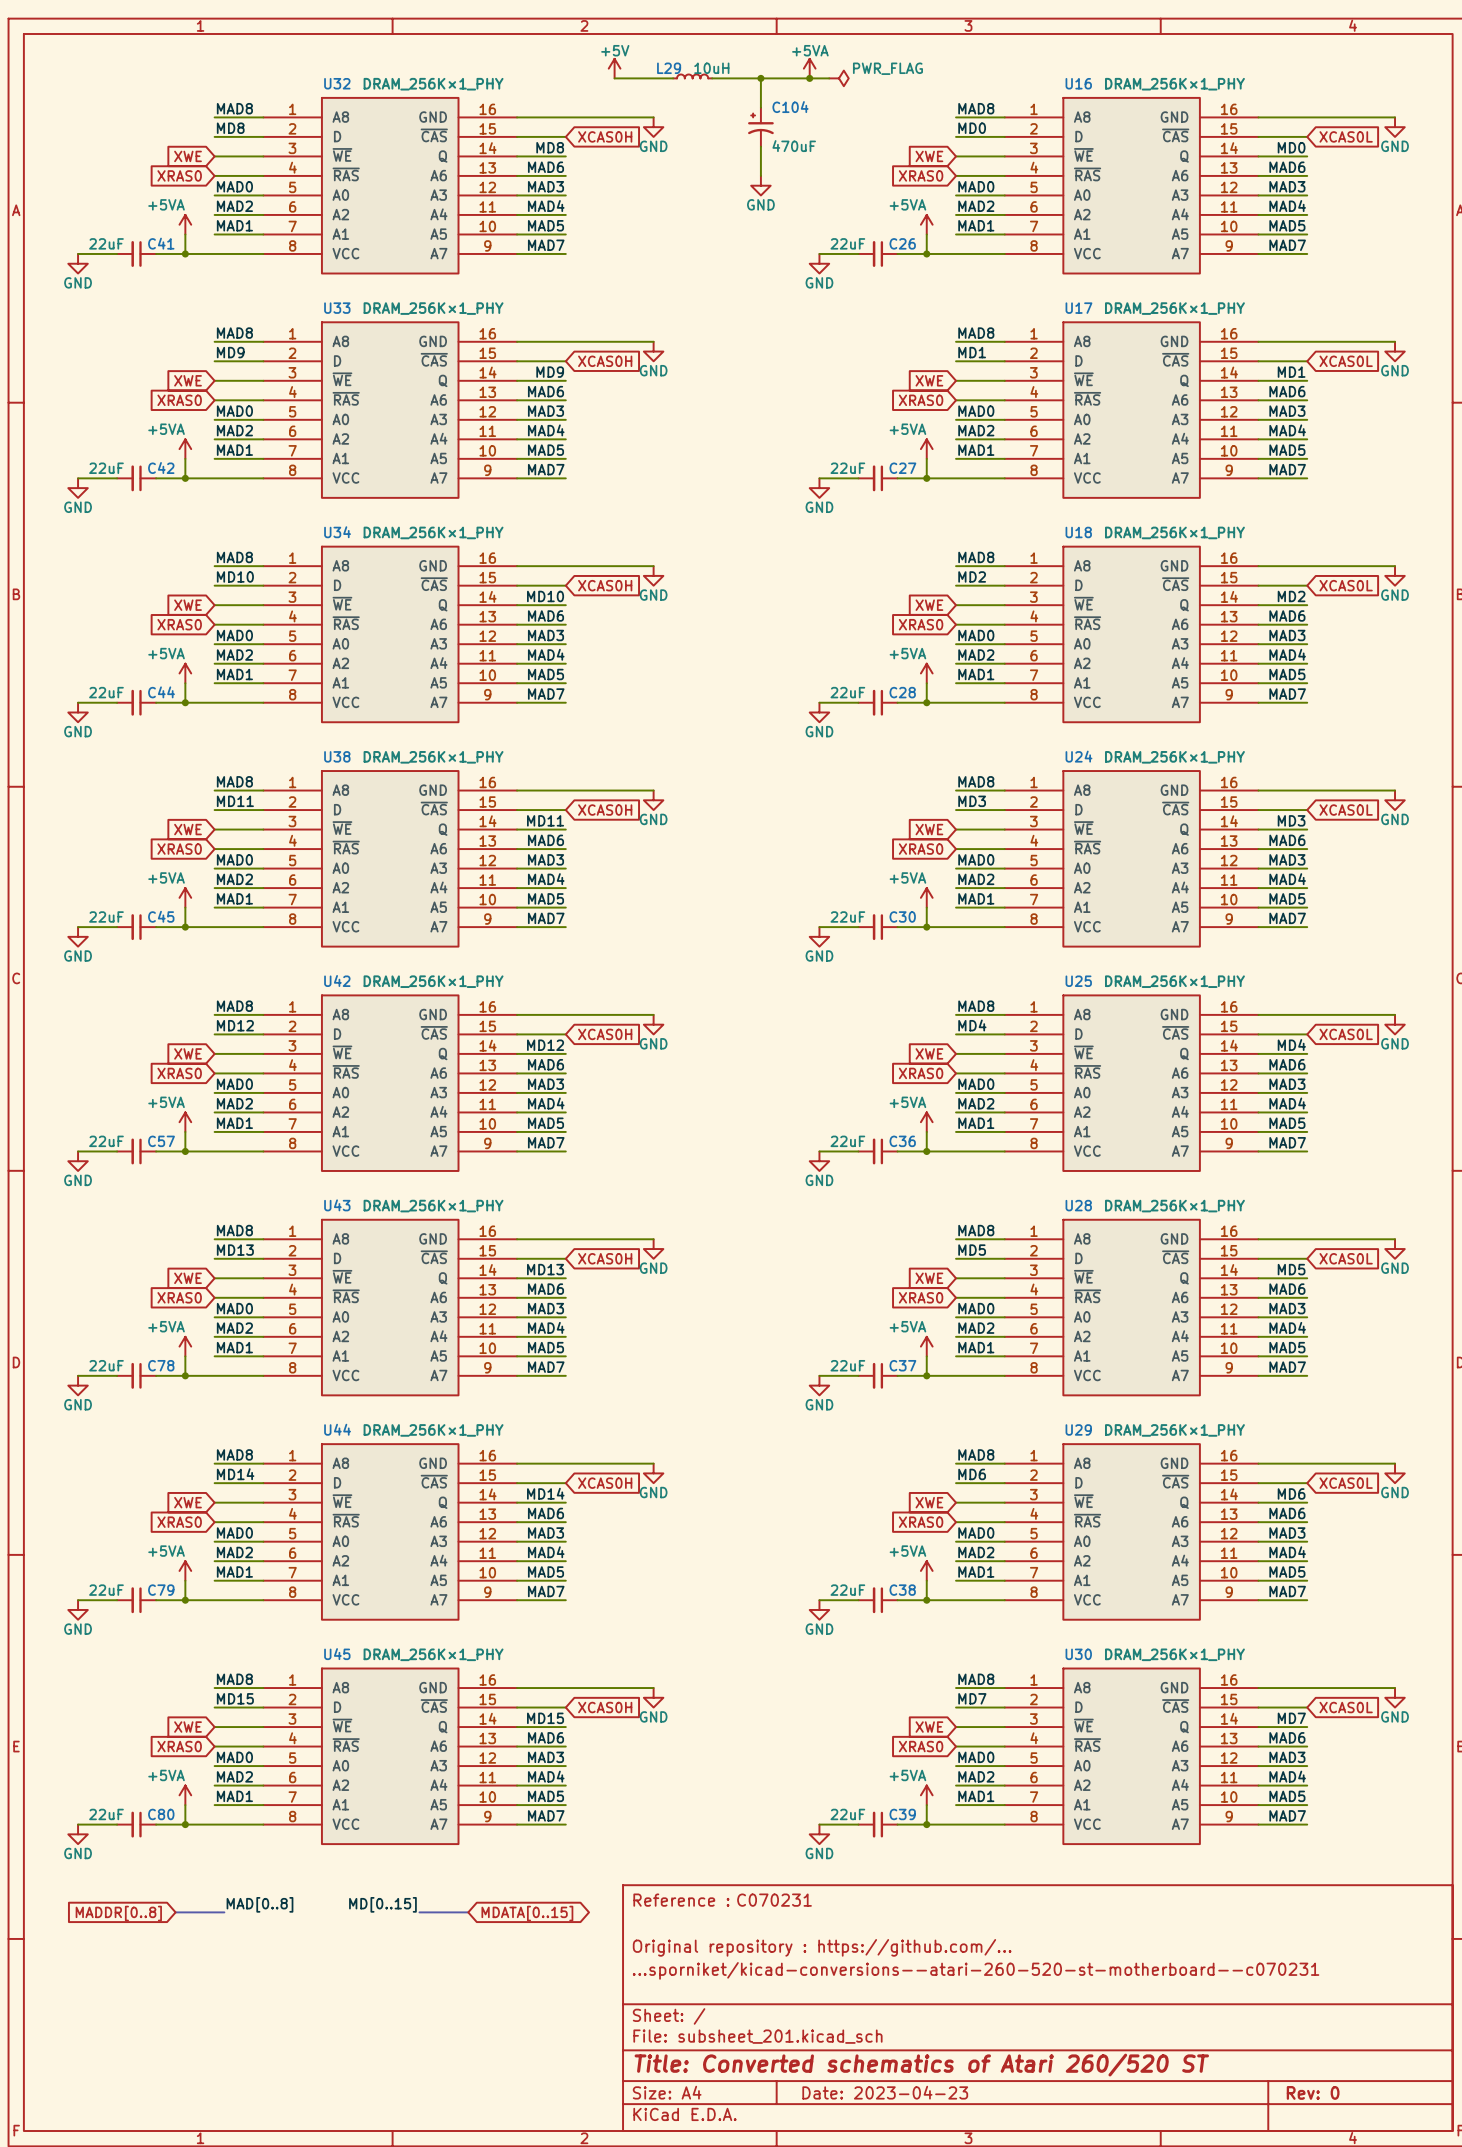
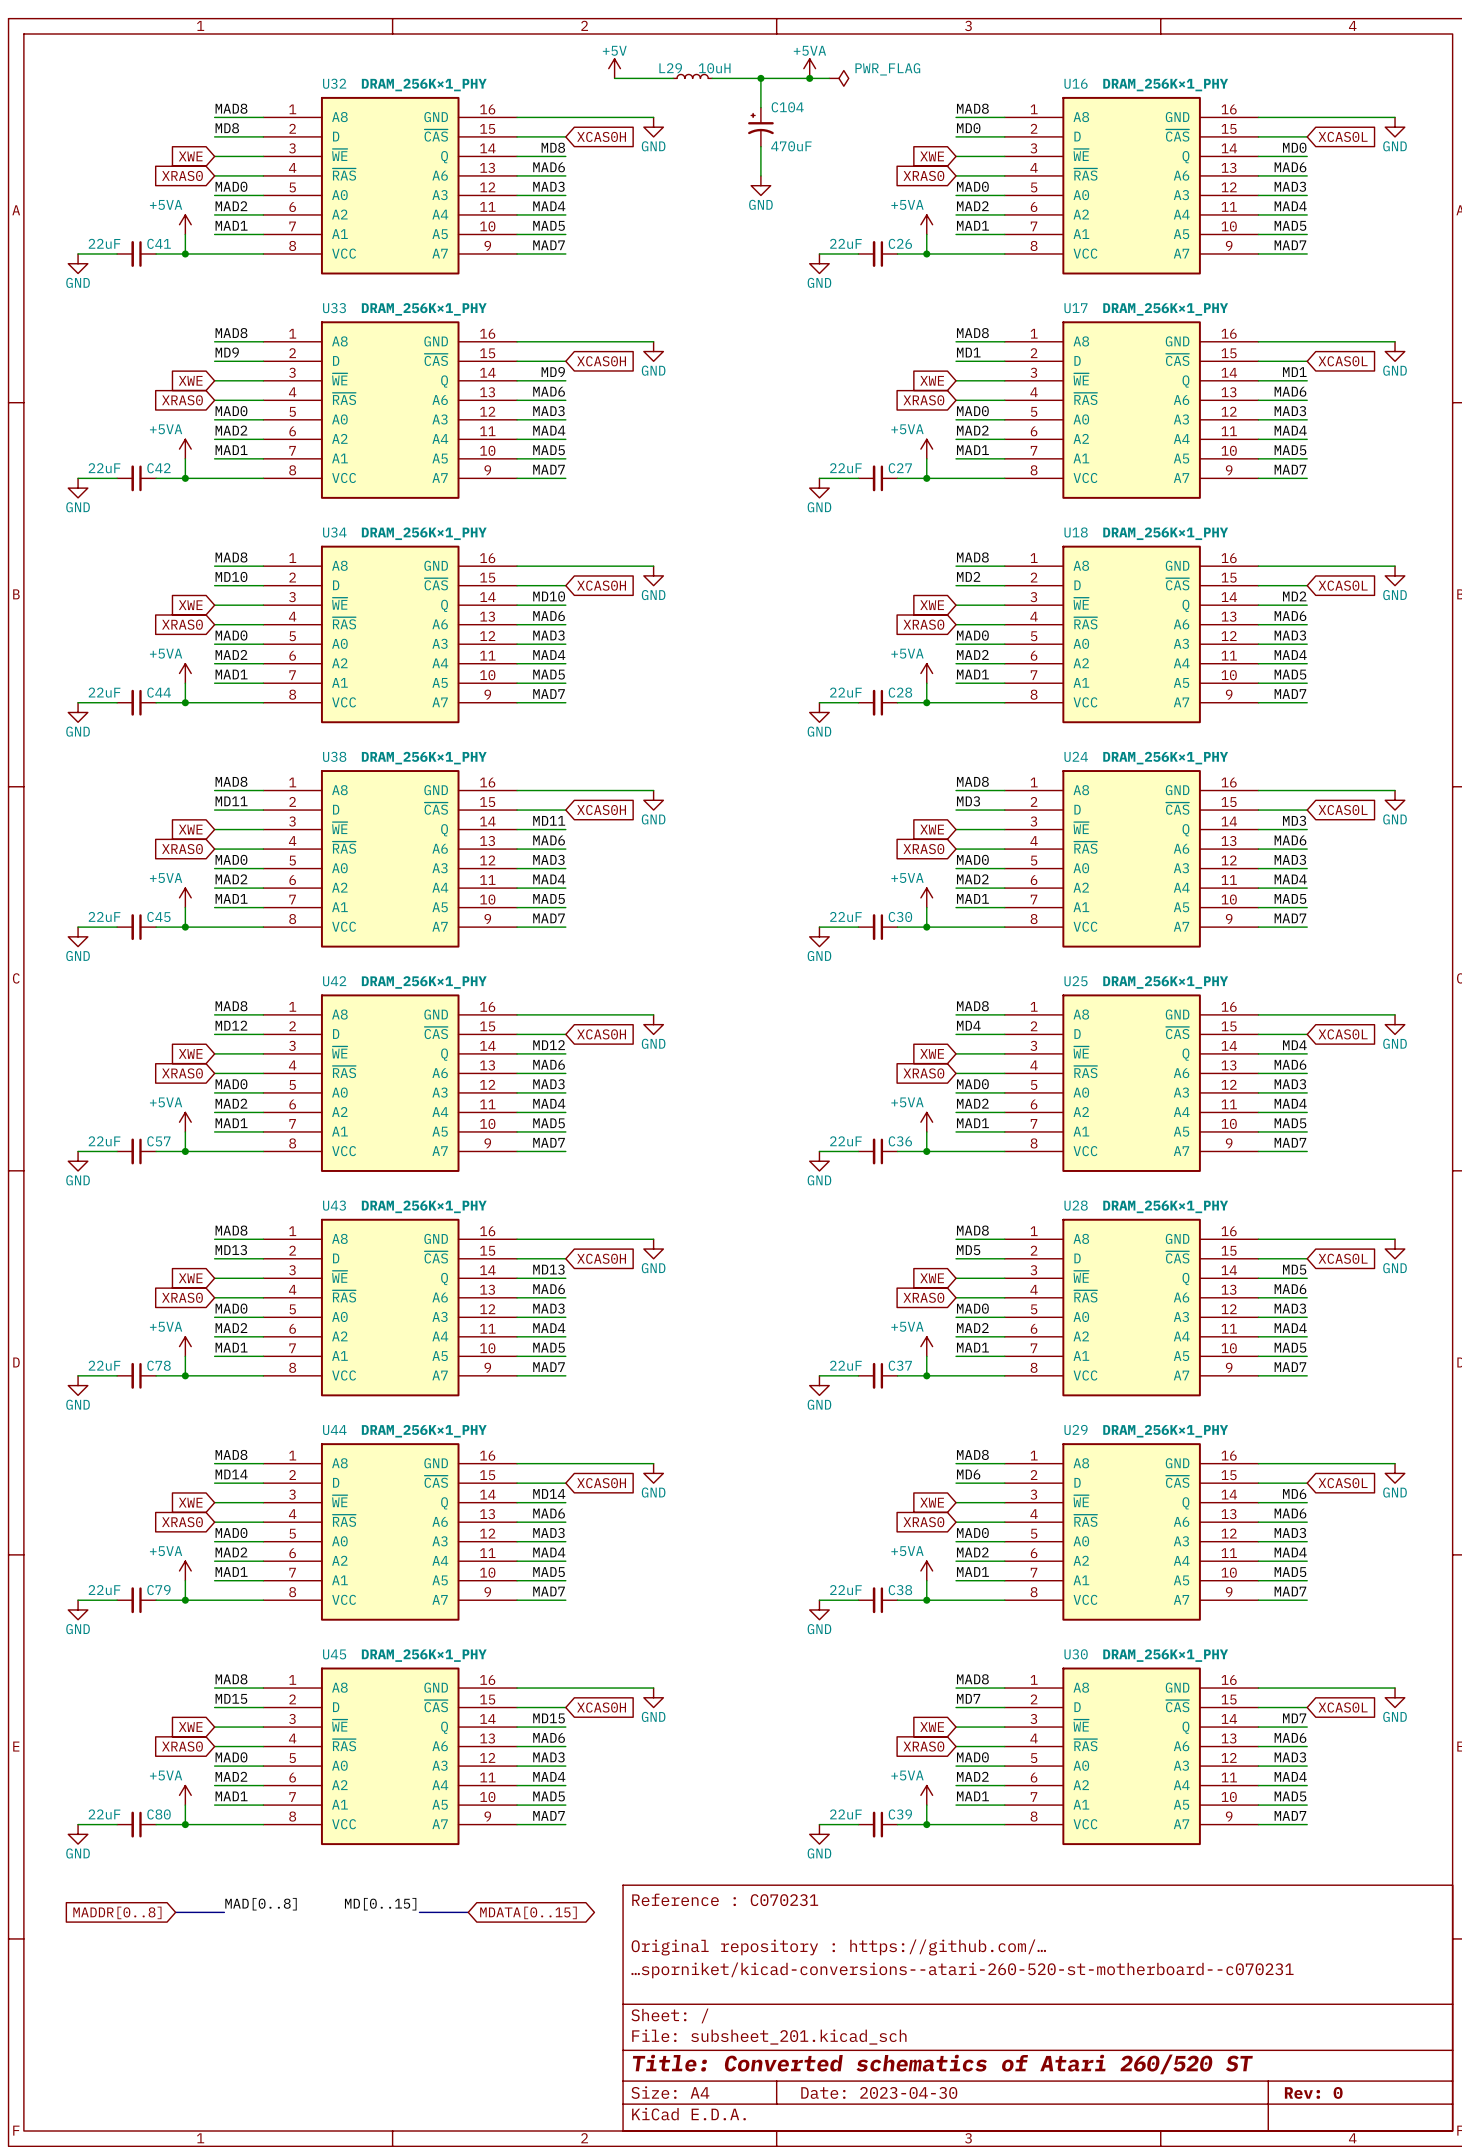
title block: Date: 2023-04-23 (885, 2092) -> Date: 2023-04-30 (879, 2092)

